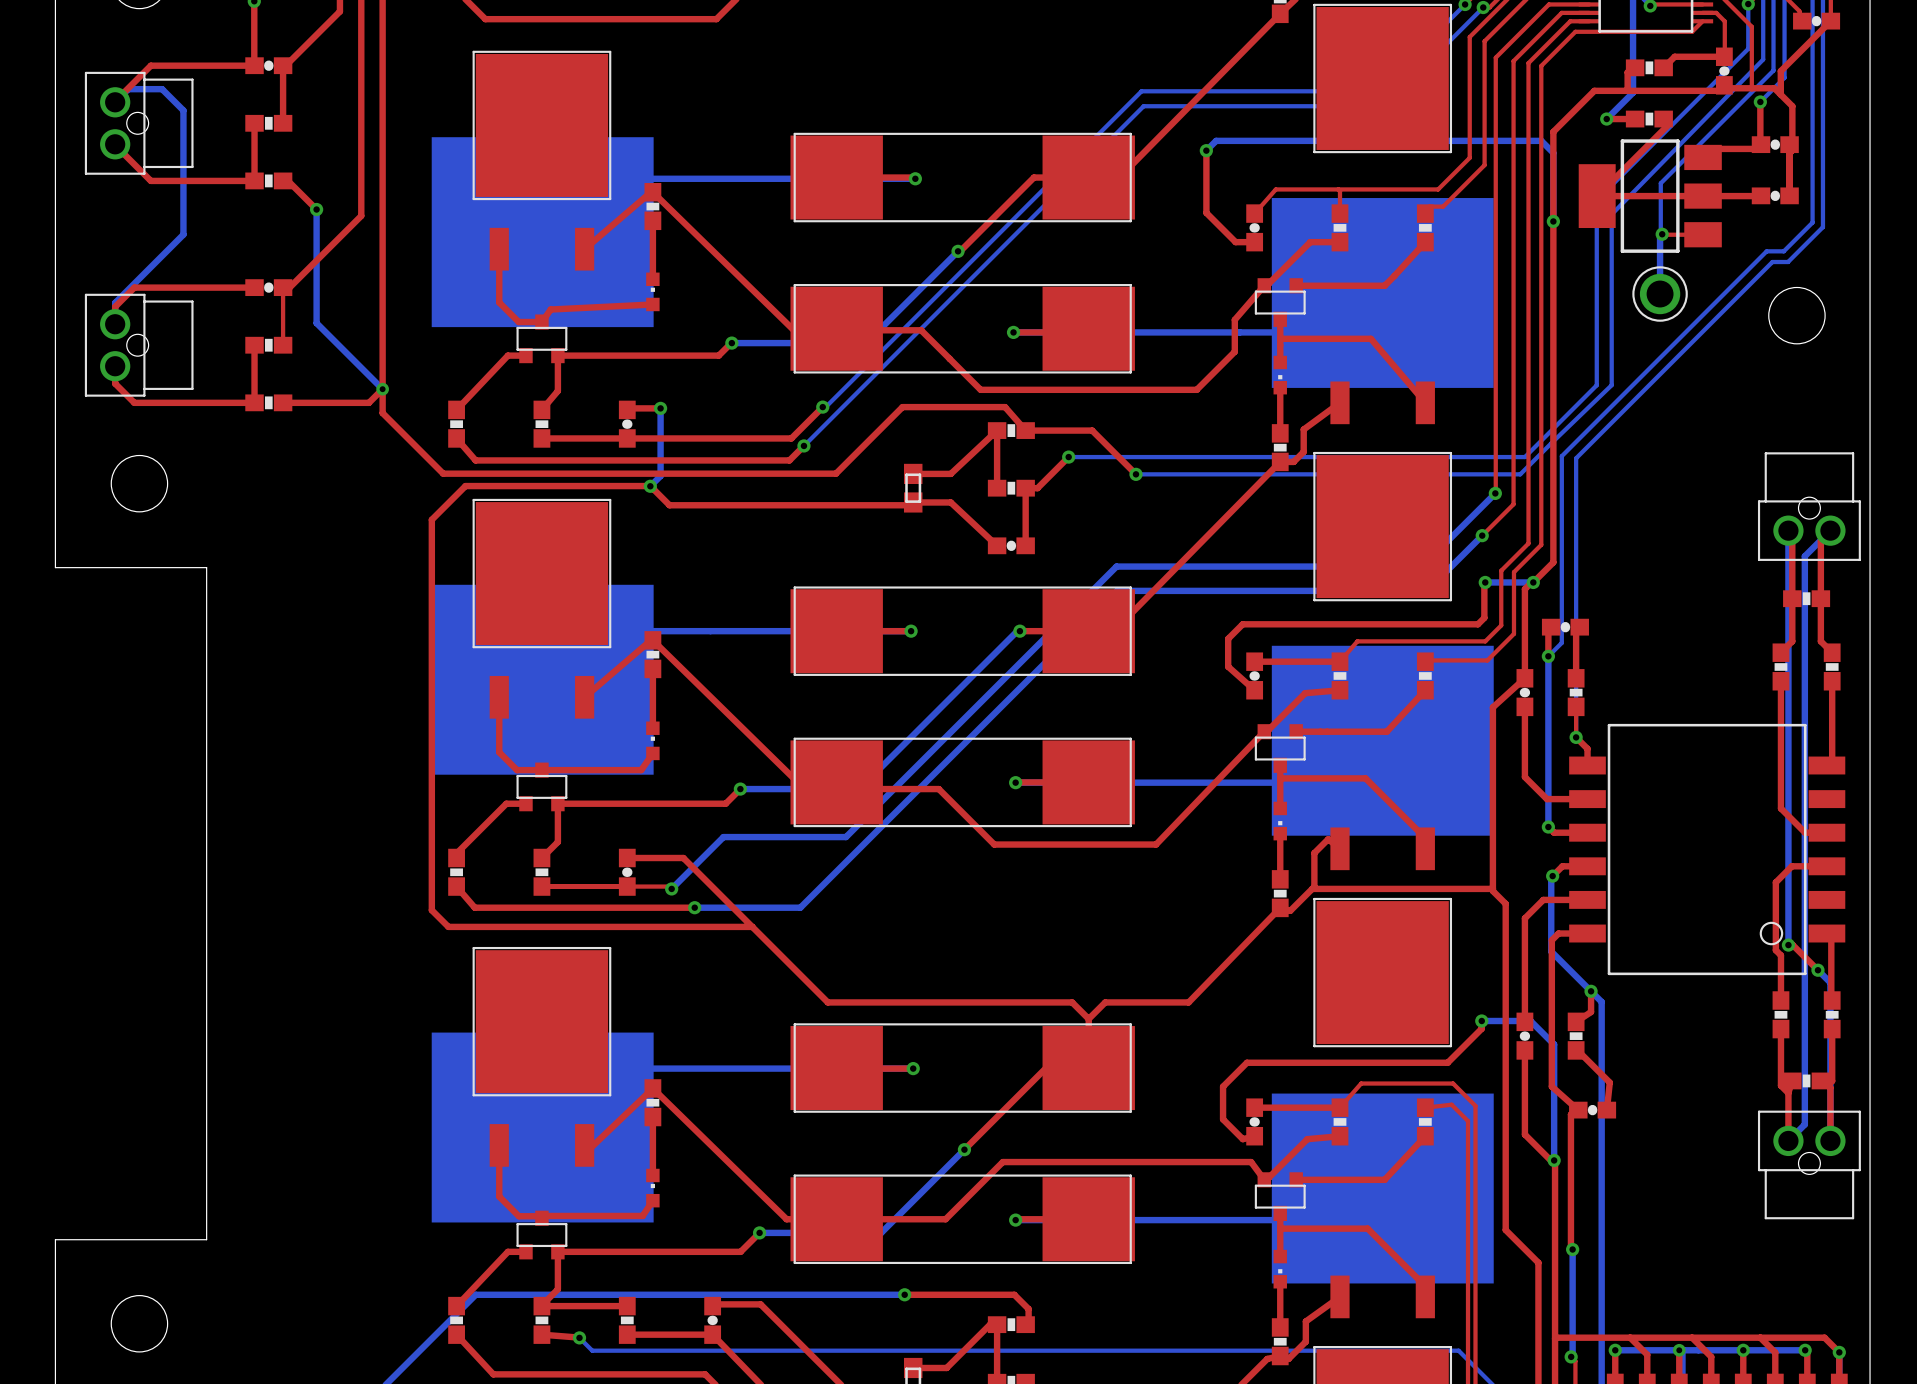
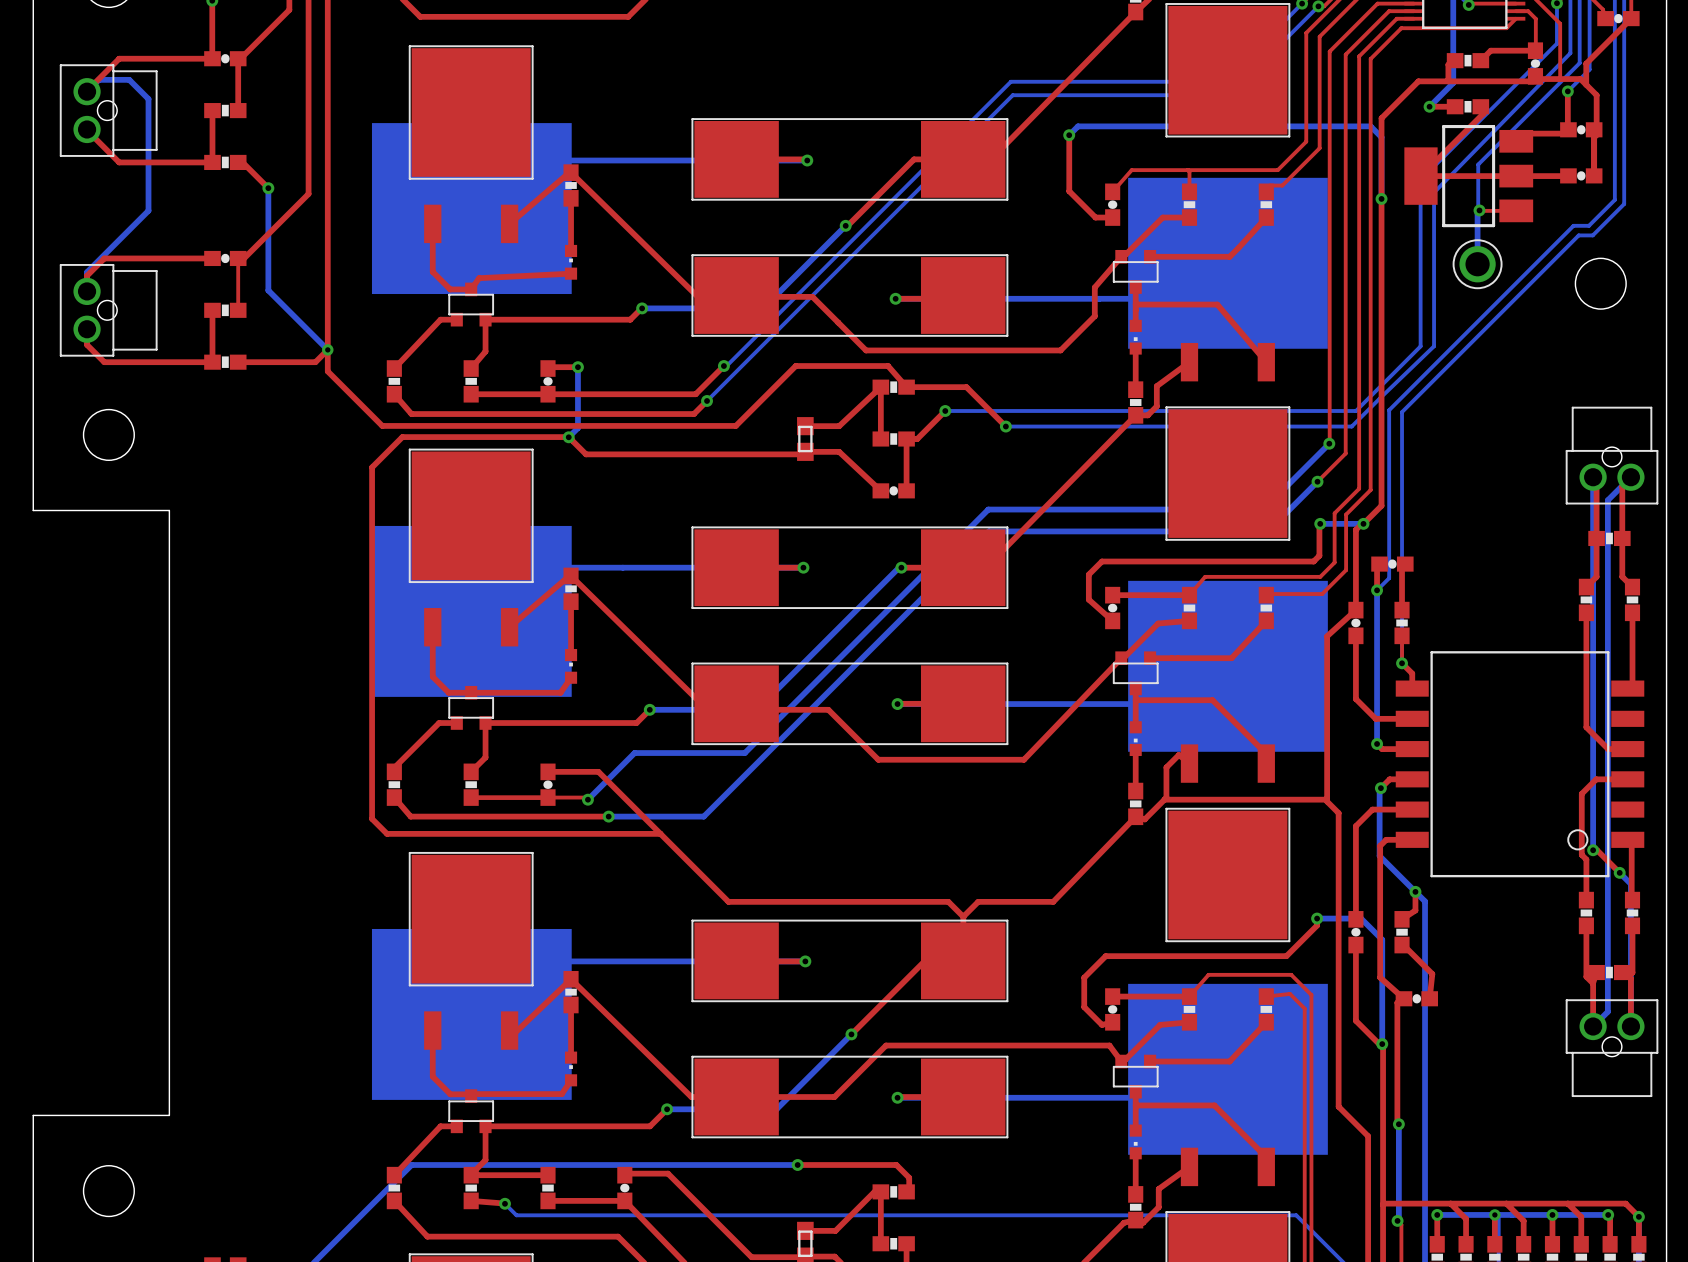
part footprint: [790, 132, 1135, 223] -> [691, 118, 1009, 201]
part footprint: [790, 284, 1135, 374] -> [691, 254, 1009, 337]
part footprint: [790, 586, 1135, 676] -> [691, 526, 1009, 610]
part footprint: [790, 737, 1135, 828] -> [691, 662, 1009, 746]
part footprint: [790, 1023, 1135, 1113] -> [691, 919, 1009, 1003]
part footprint: [790, 1174, 1135, 1265] -> [691, 1055, 1009, 1139]

